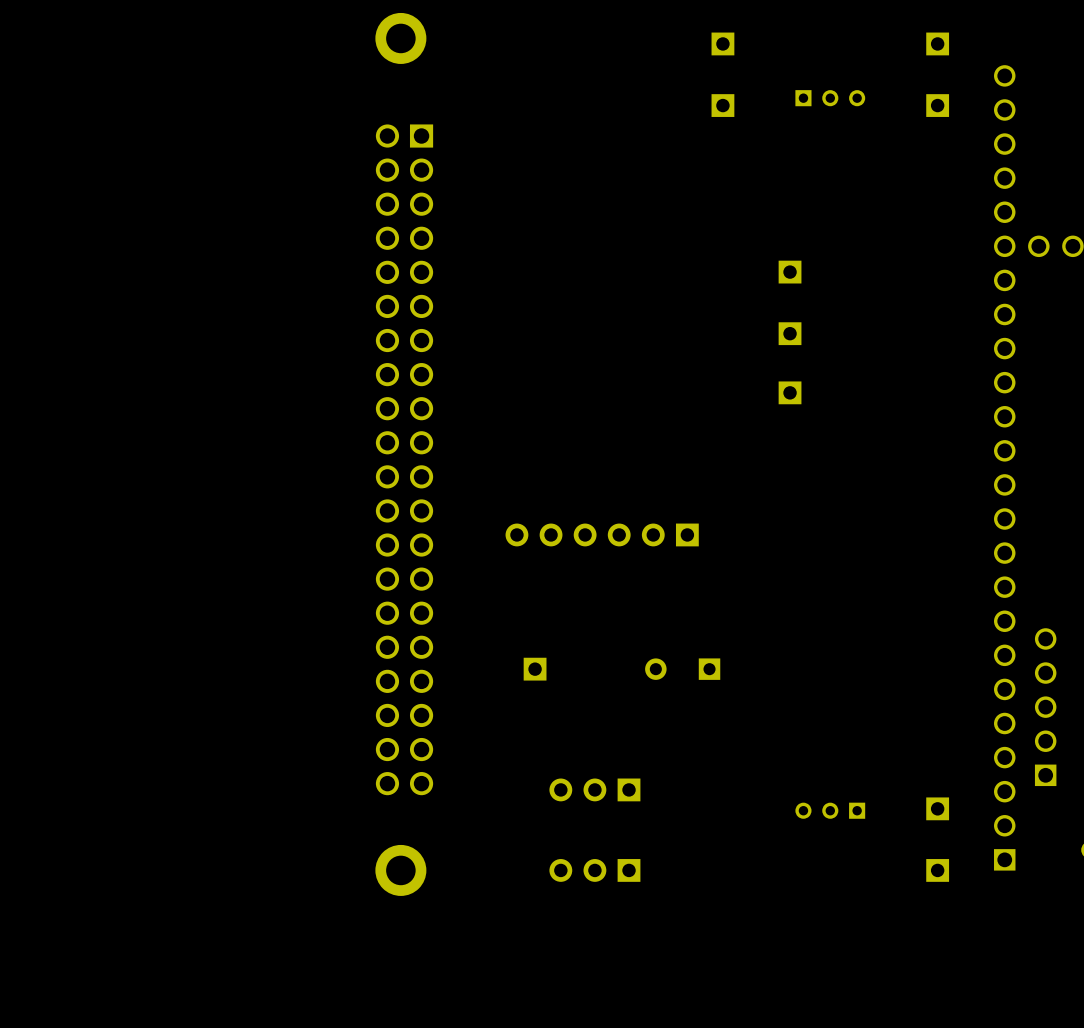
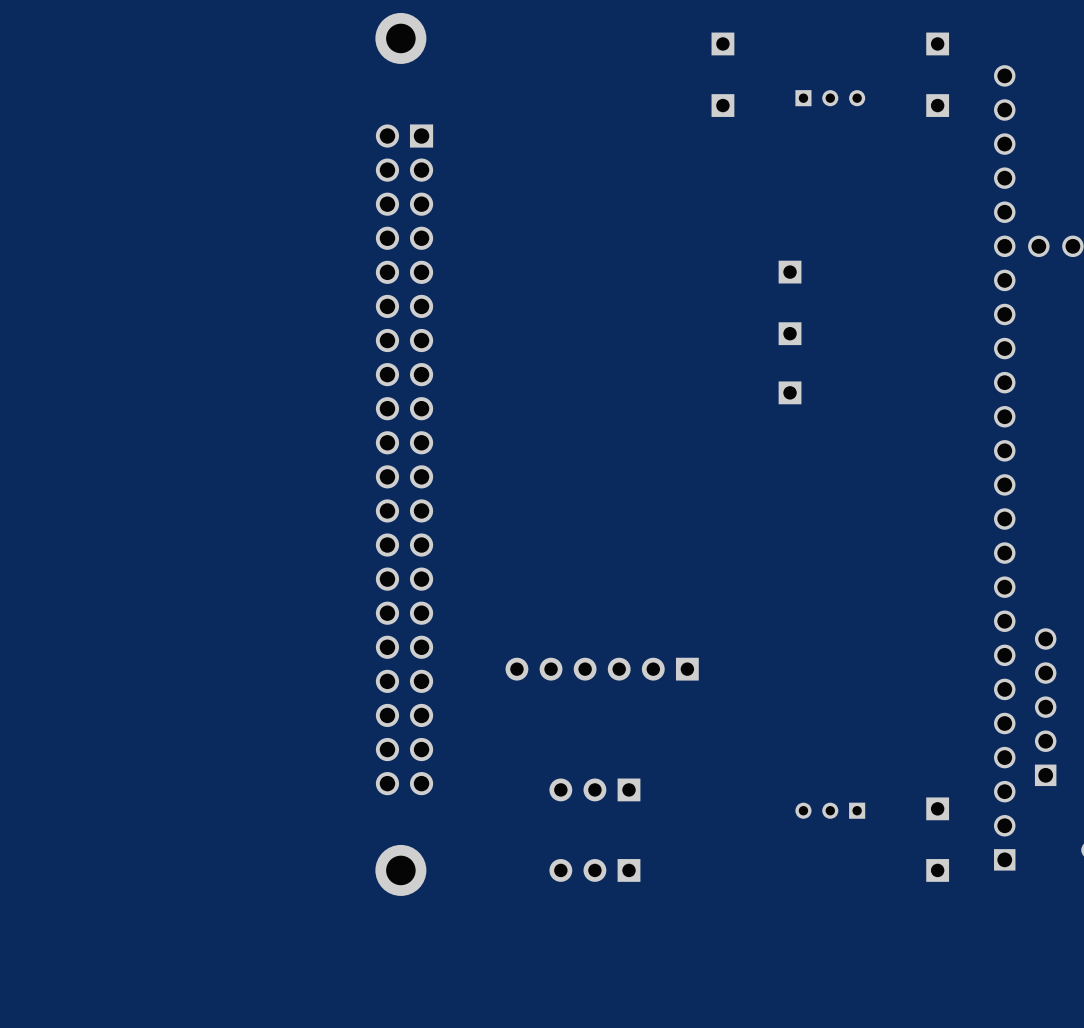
part position: (602, 534) -> (602, 669)
part: (535, 669) -> none
part: (682, 669) -> none

